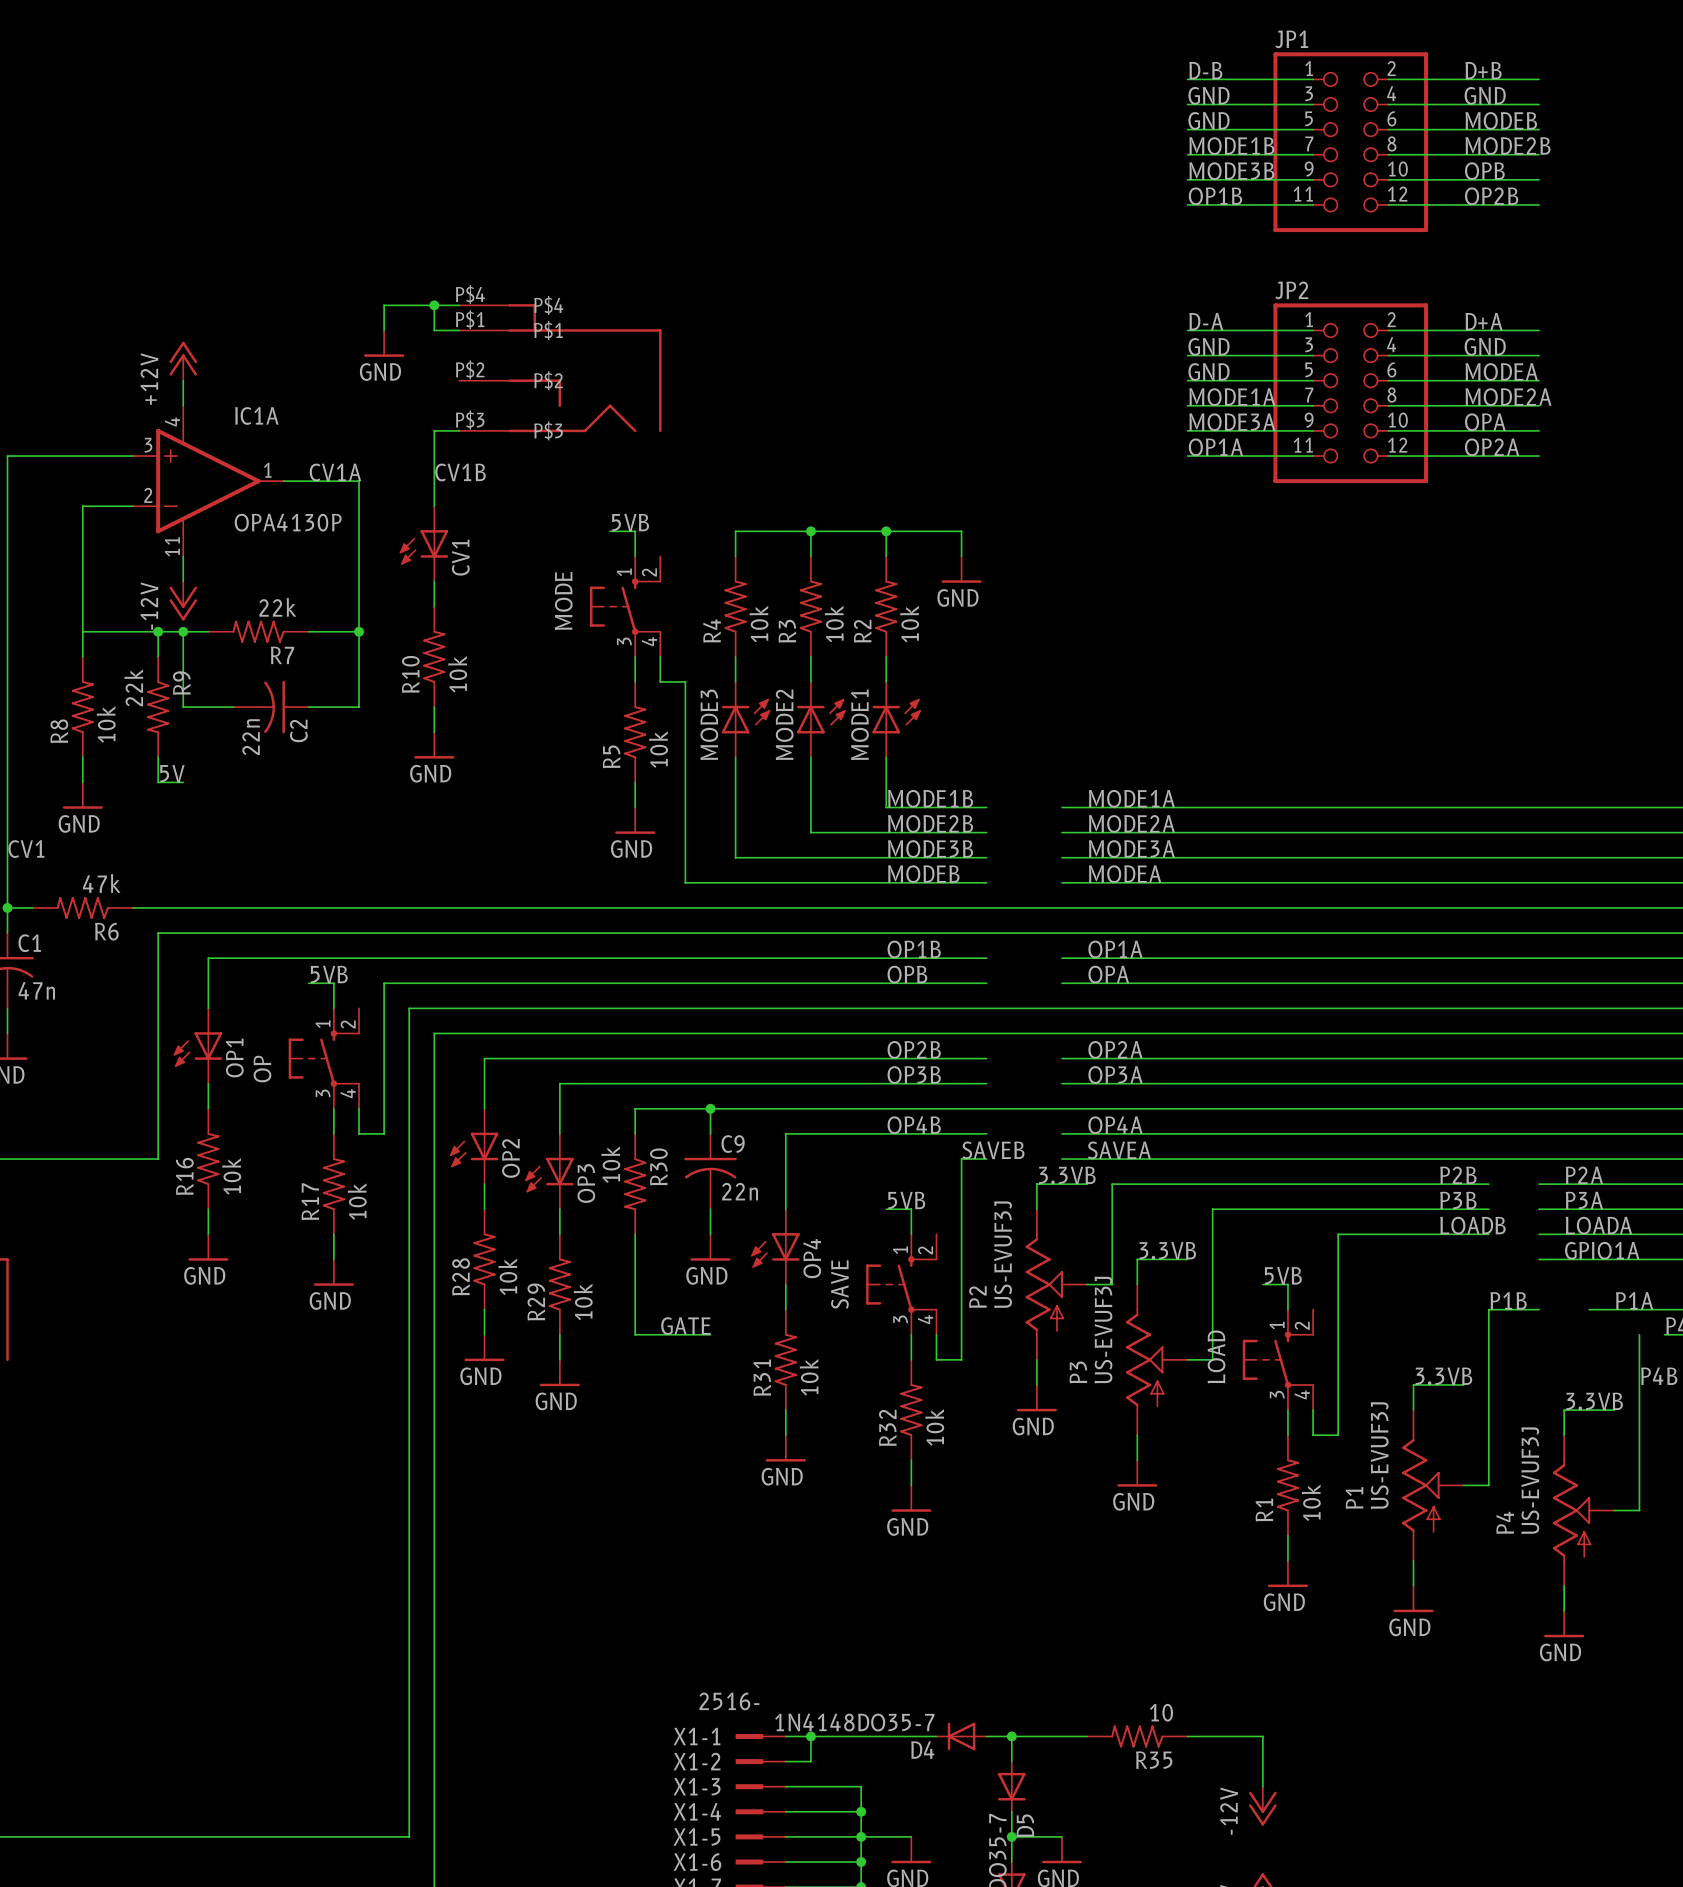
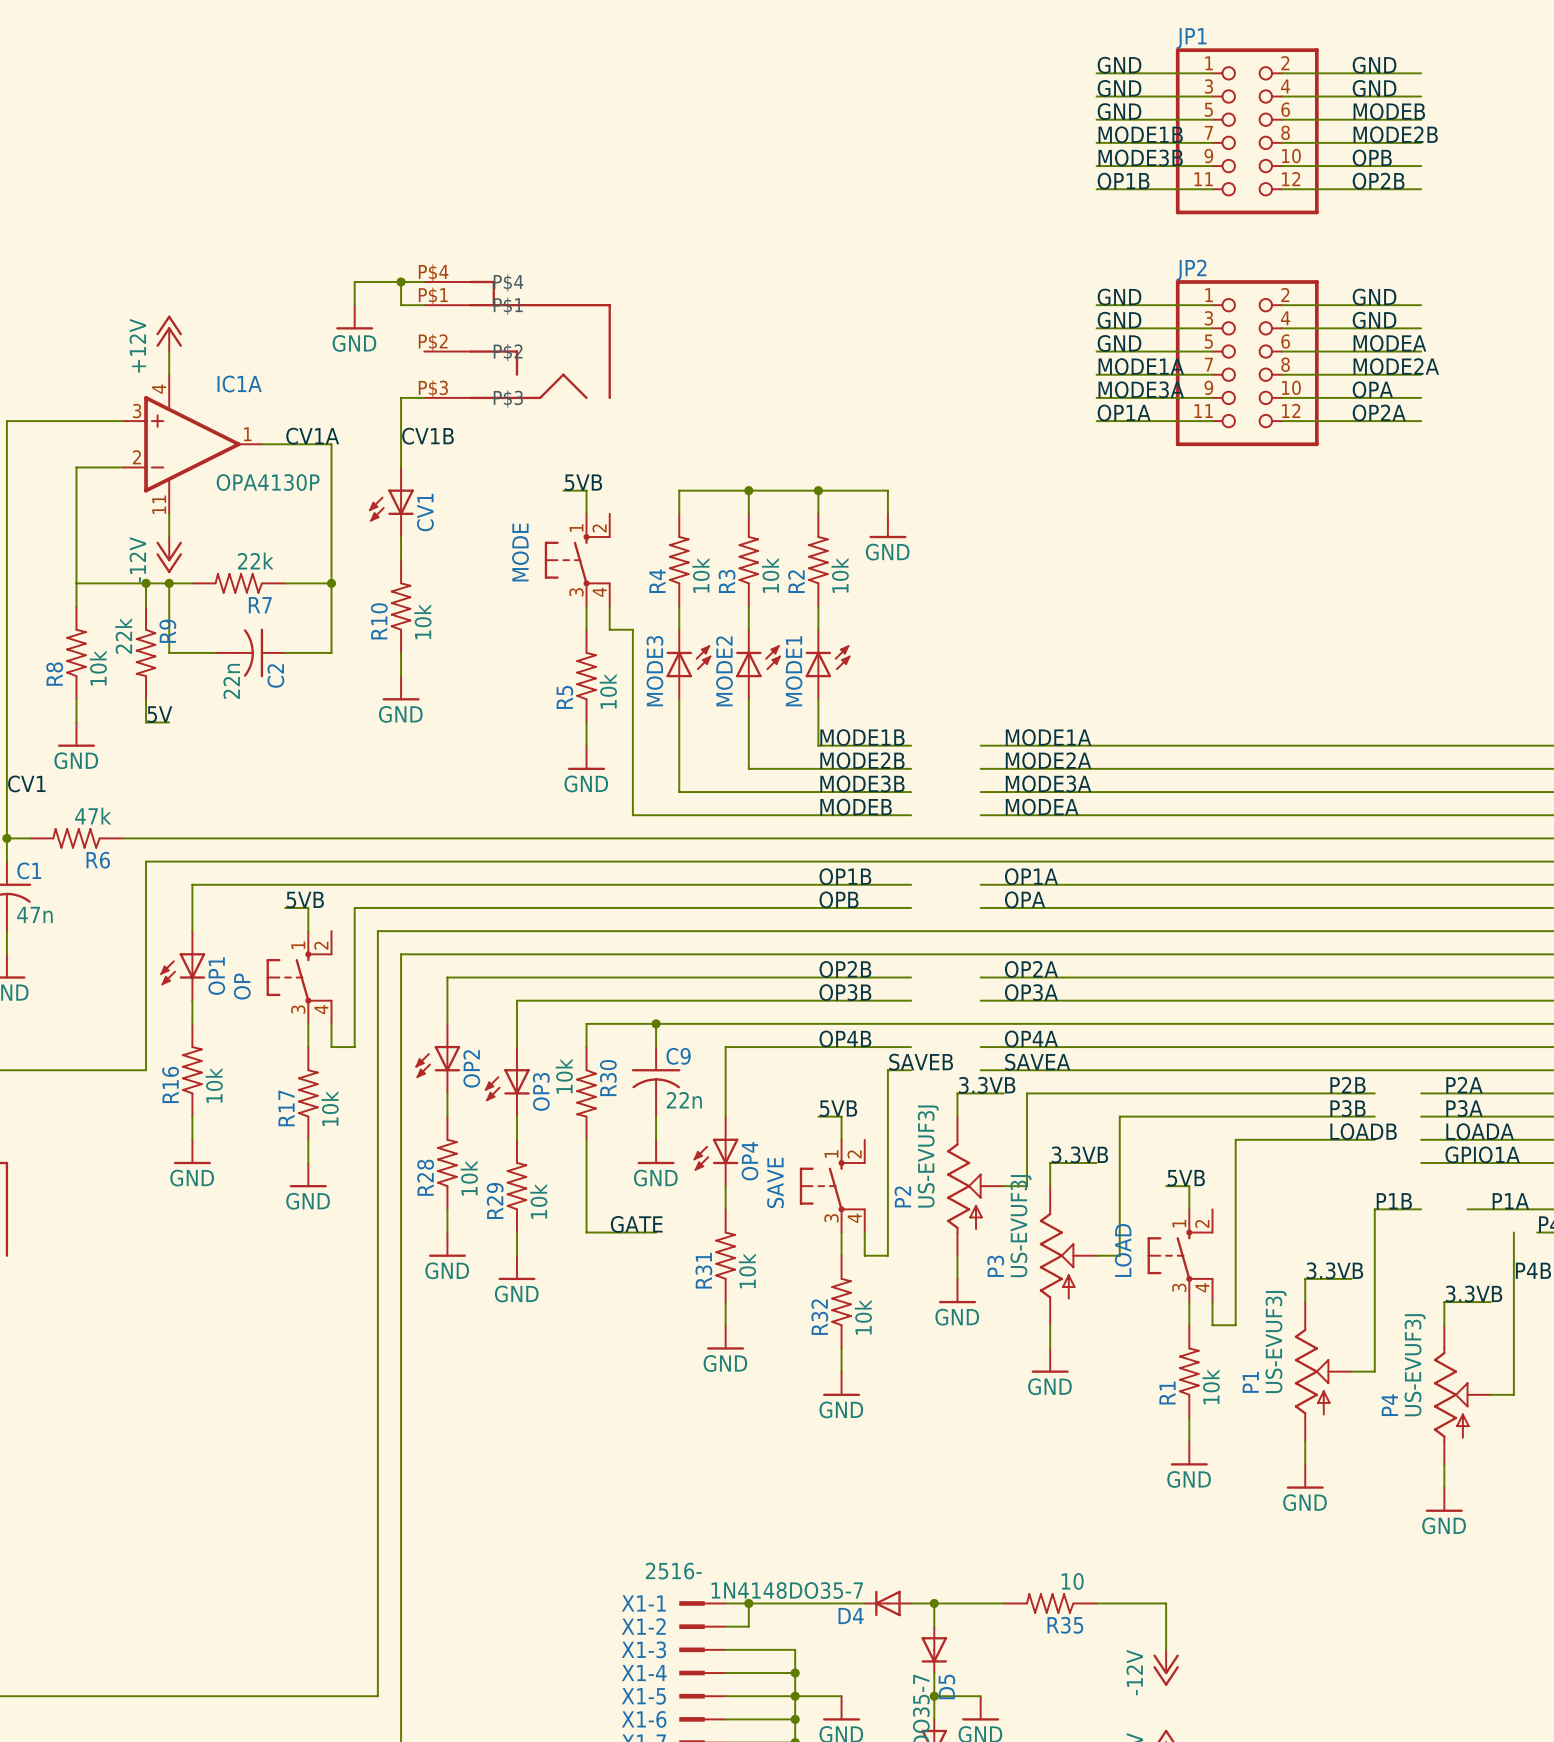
label: D-B (1205, 70) -> GND (1119, 65)
label: D+B (1483, 70) -> GND (1374, 65)
label: D-A (1206, 321) -> GND (1119, 297)
label: D+A (1484, 321) -> GND (1374, 297)

